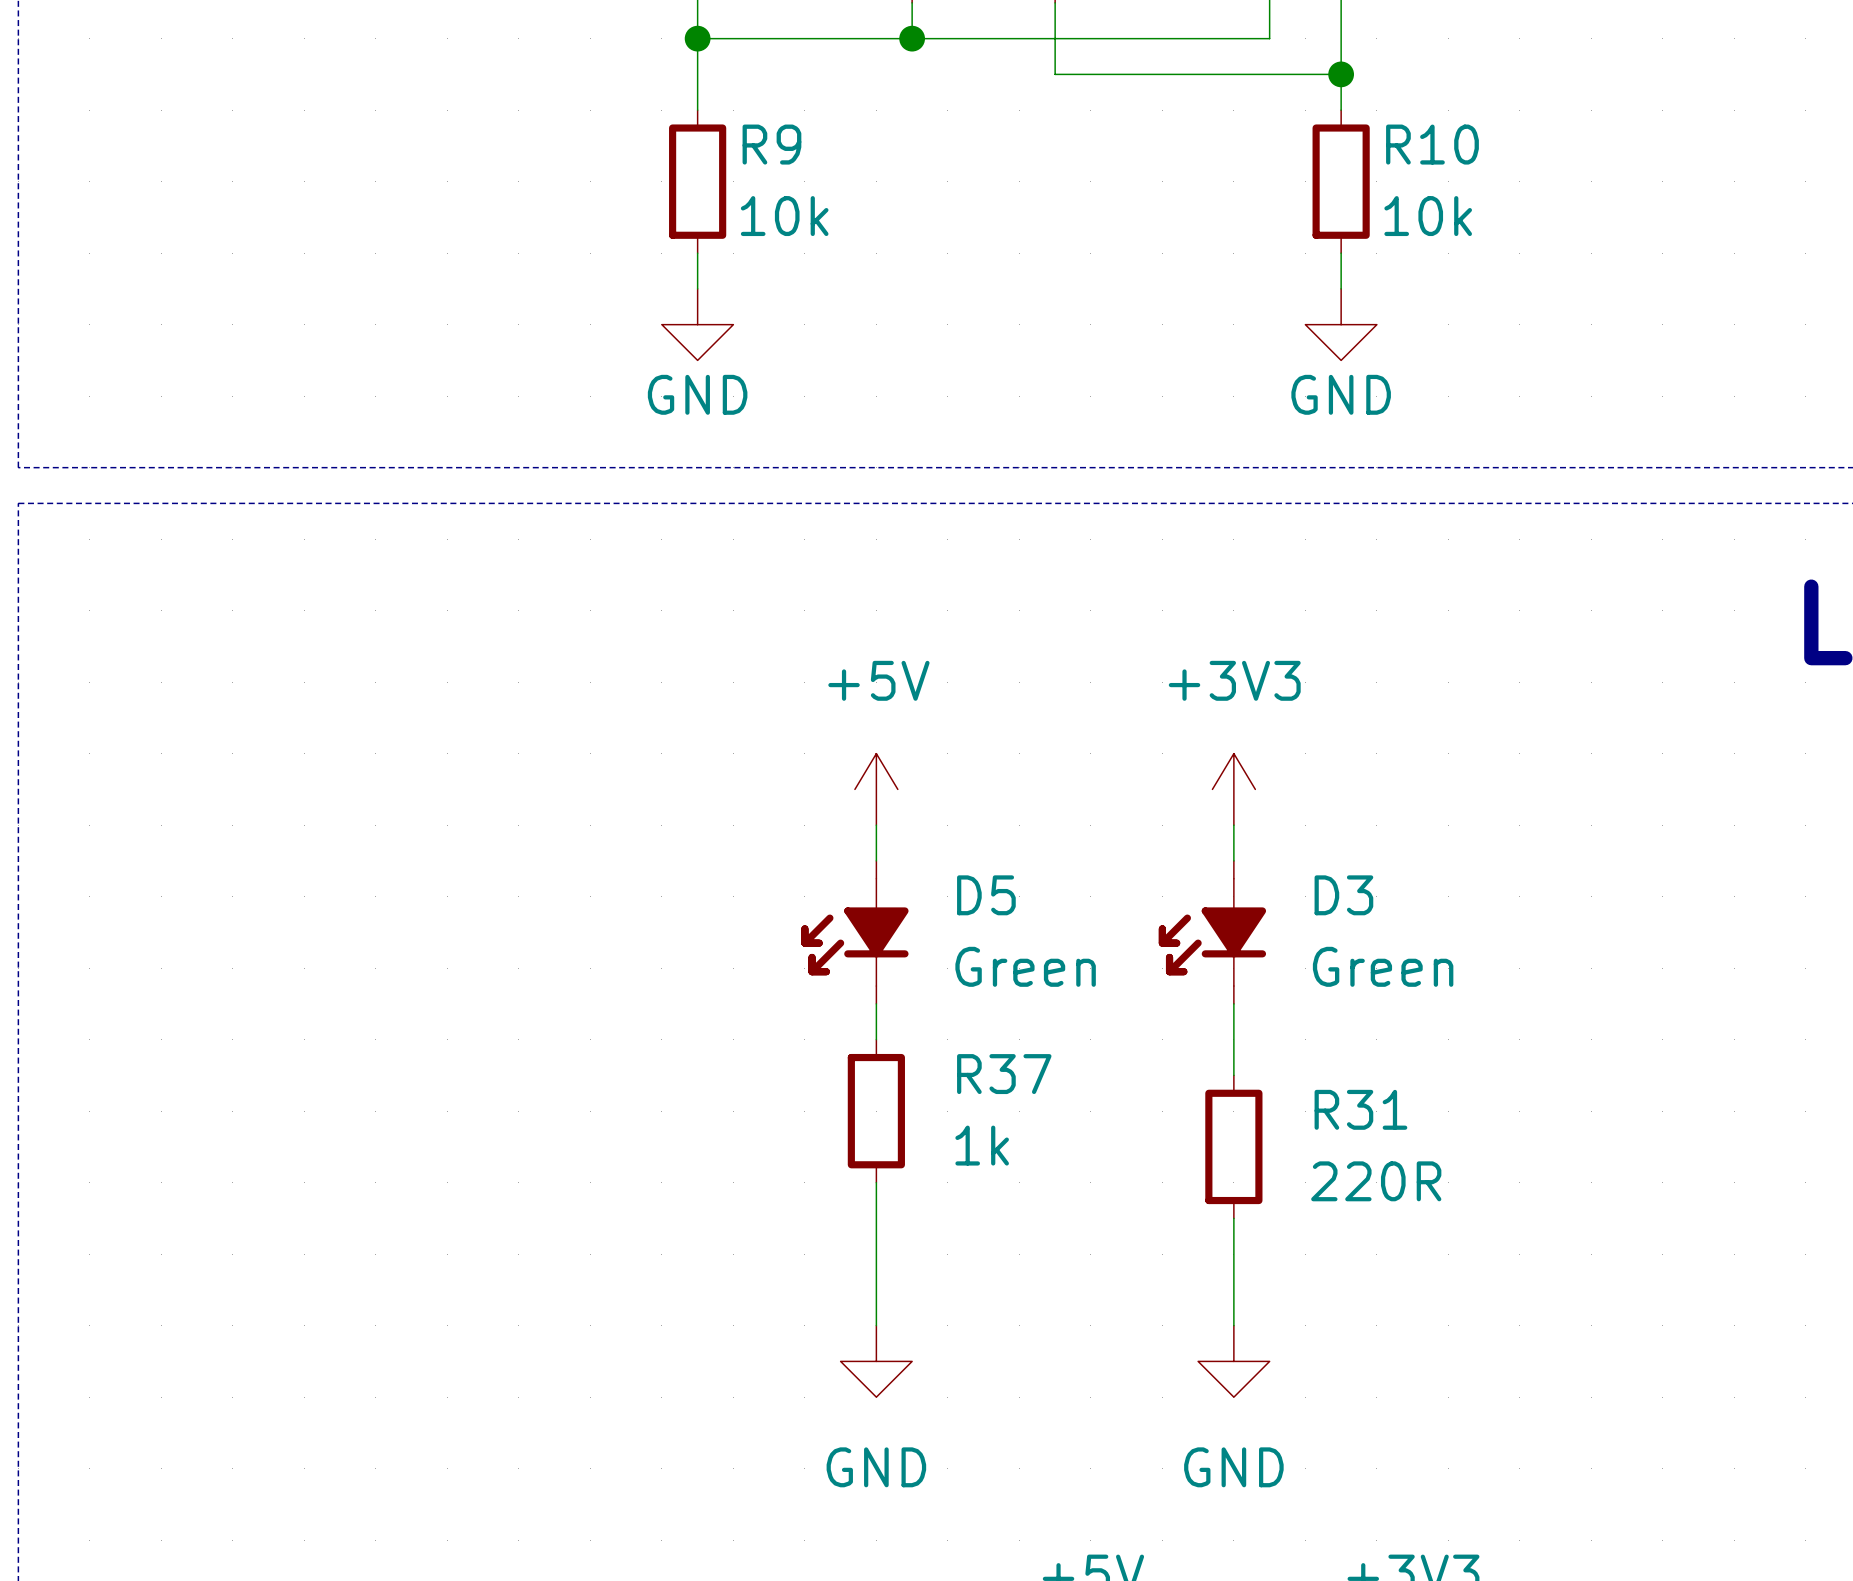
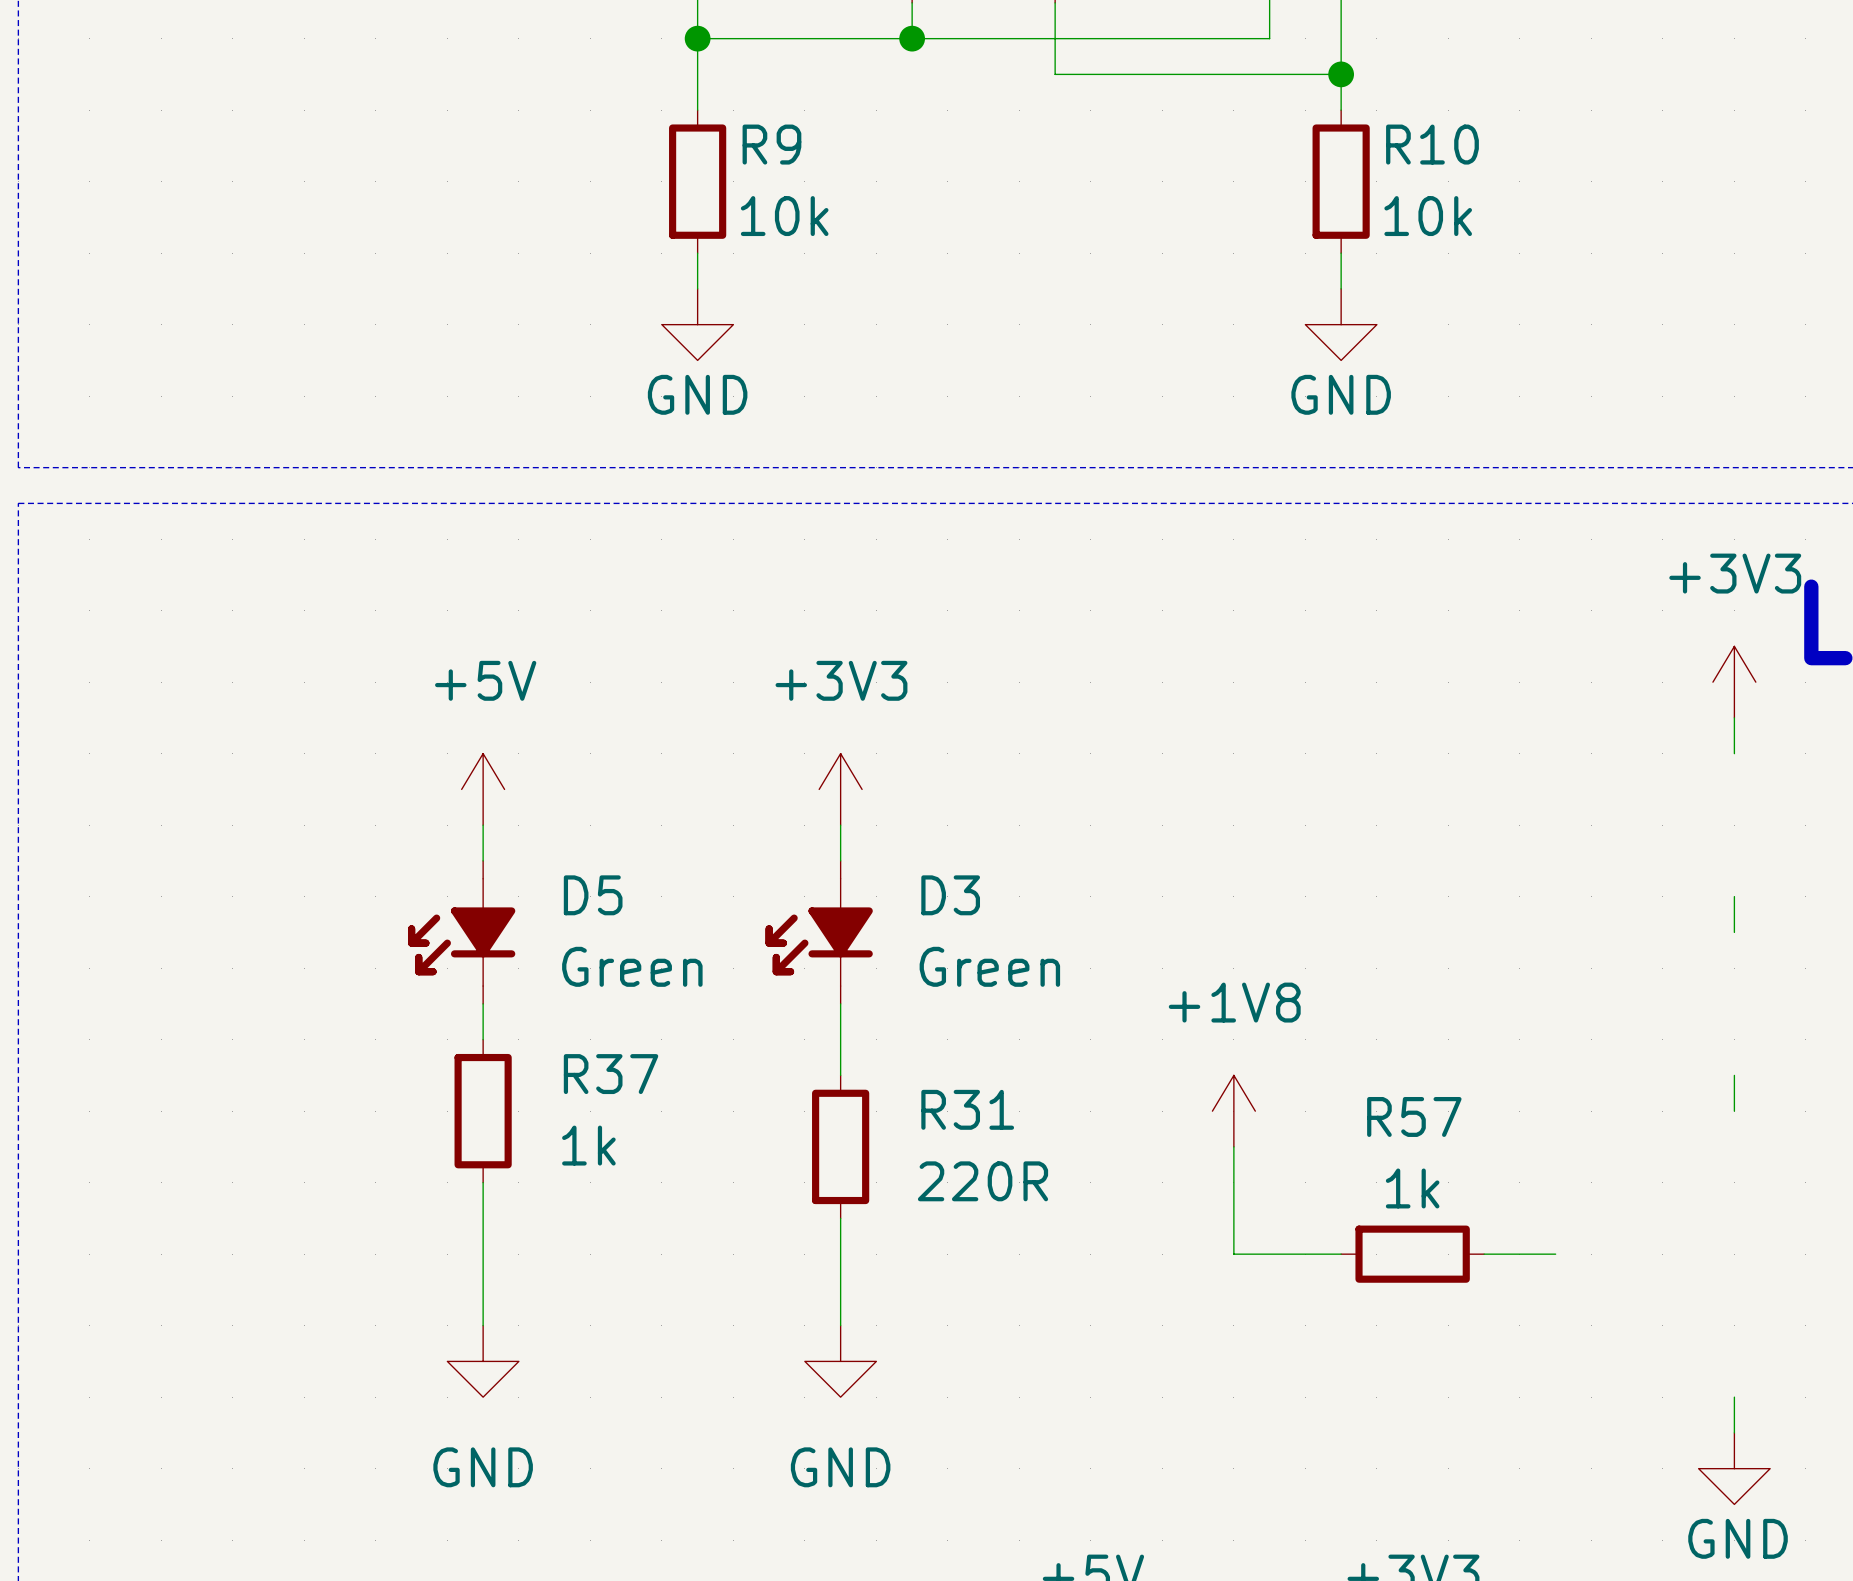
power symbol: none -> +3V3 (1734, 682)
wire: none -> (1734, 717) (1734, 753)
power symbol: none -> +3V3 (840, 789)
power symbol position: +5V (876, 789) -> +5V (483, 789)
power symbol: +3V3 (1233, 789) -> none
wire: (876, 825) (876, 860) -> (483, 825) (483, 860)
wire: (1233, 825) (1233, 860) -> (840, 825) (840, 860)
wire: none -> (1734, 896) (1734, 932)
D5 position: (854, 932) -> (461, 932)
D3 position: (1212, 932) -> (819, 932)
wire: (876, 1003) (876, 1039) -> (483, 1003) (483, 1039)
wire: (1233, 1003) (1233, 1075) -> (840, 1003) (840, 1075)
wire: none -> (1734, 1075) (1734, 1111)
R37 position: (876, 1111) -> (483, 1111)
power symbol: none -> +1V8 (1233, 1111)
wire: none -> (1233, 1146) (1233, 1218)
R31 position: (1233, 1146) -> (840, 1146)
wire: (876, 1182) (876, 1325) -> (483, 1182) (483, 1325)
wire: none -> (840, 1218) (840, 1325)
wire: (1233, 1254) (1233, 1325) -> (1233, 1254) (1341, 1254)
R57: none -> (1412, 1254)
wire: none -> (1484, 1254) (1555, 1254)
power symbol: none -> GND (483, 1361)
power symbol position: GND (876, 1361) -> GND (840, 1361)
power symbol: GND (1233, 1361) -> none
wire: none -> (1734, 1397) (1734, 1432)
power symbol: none -> GND (1734, 1468)

